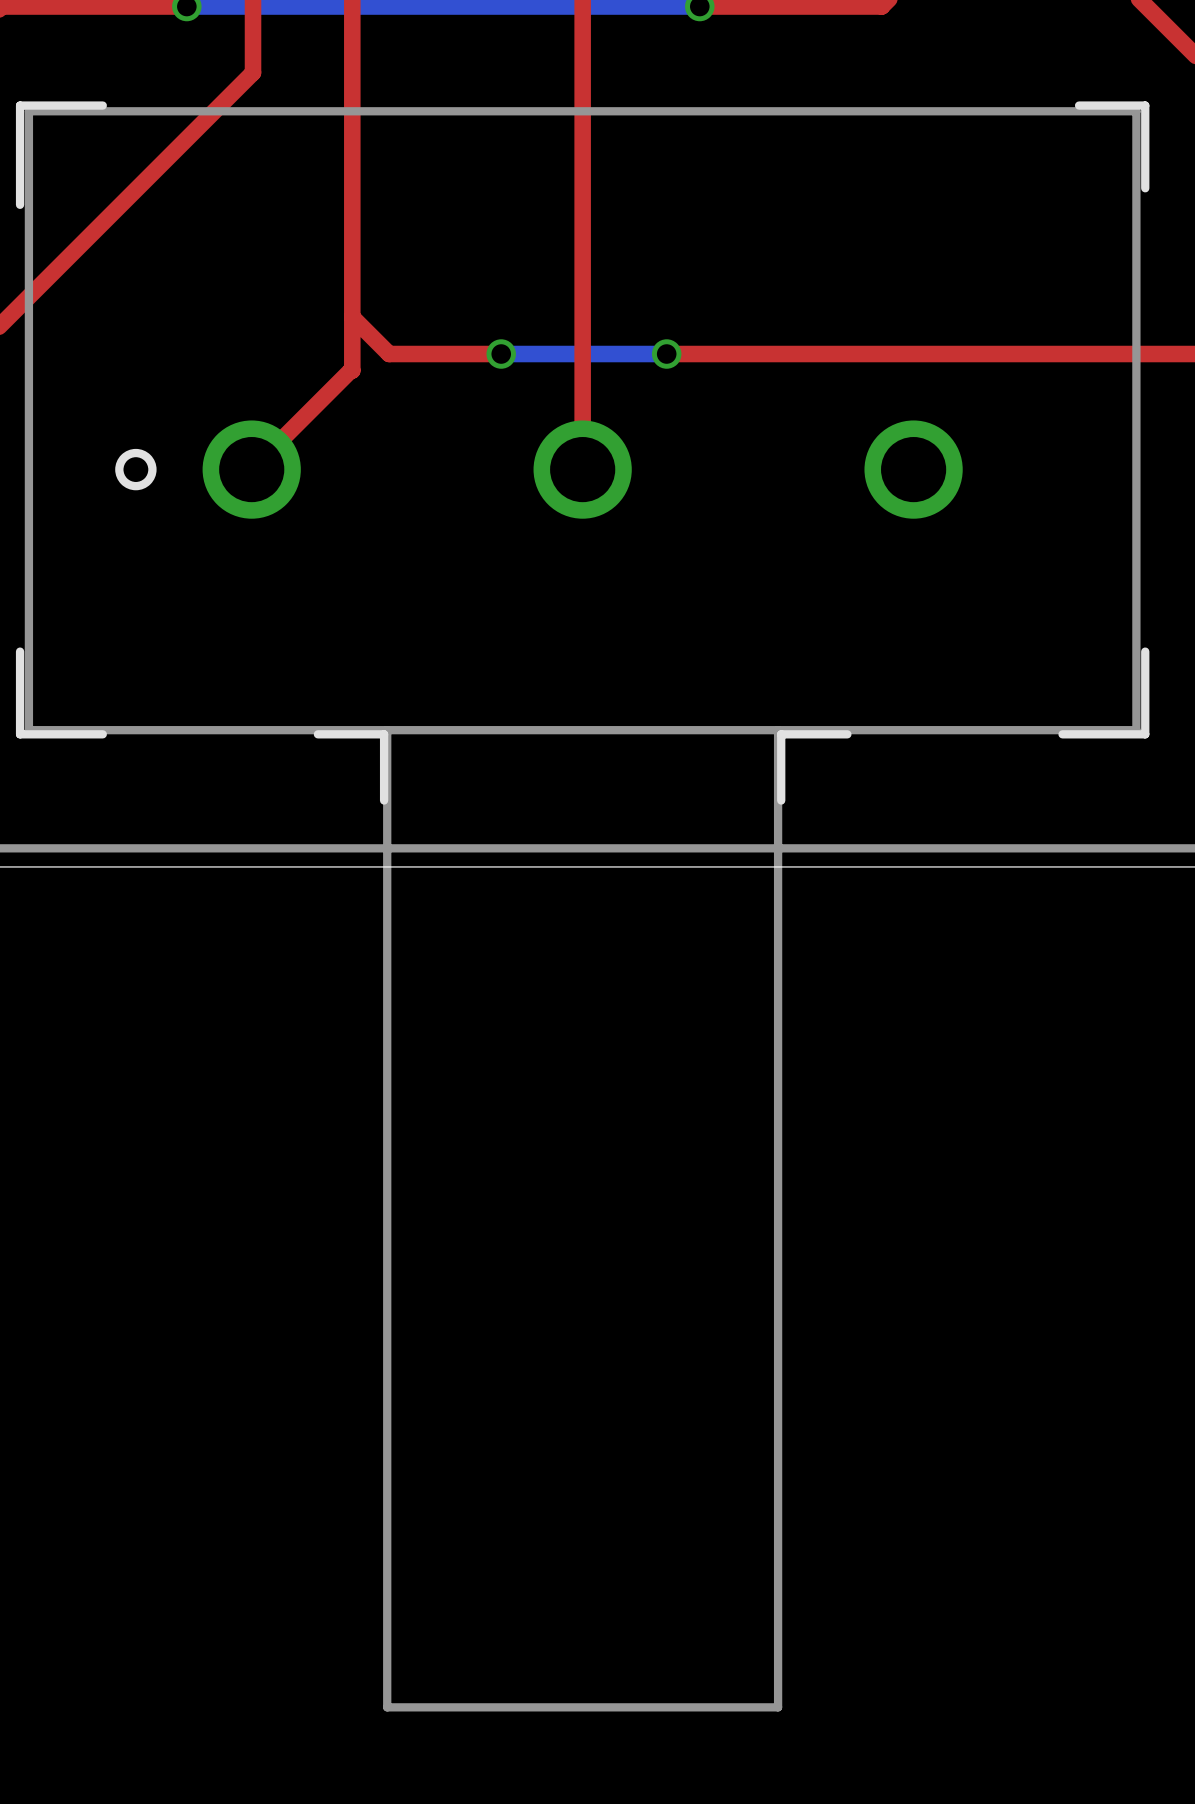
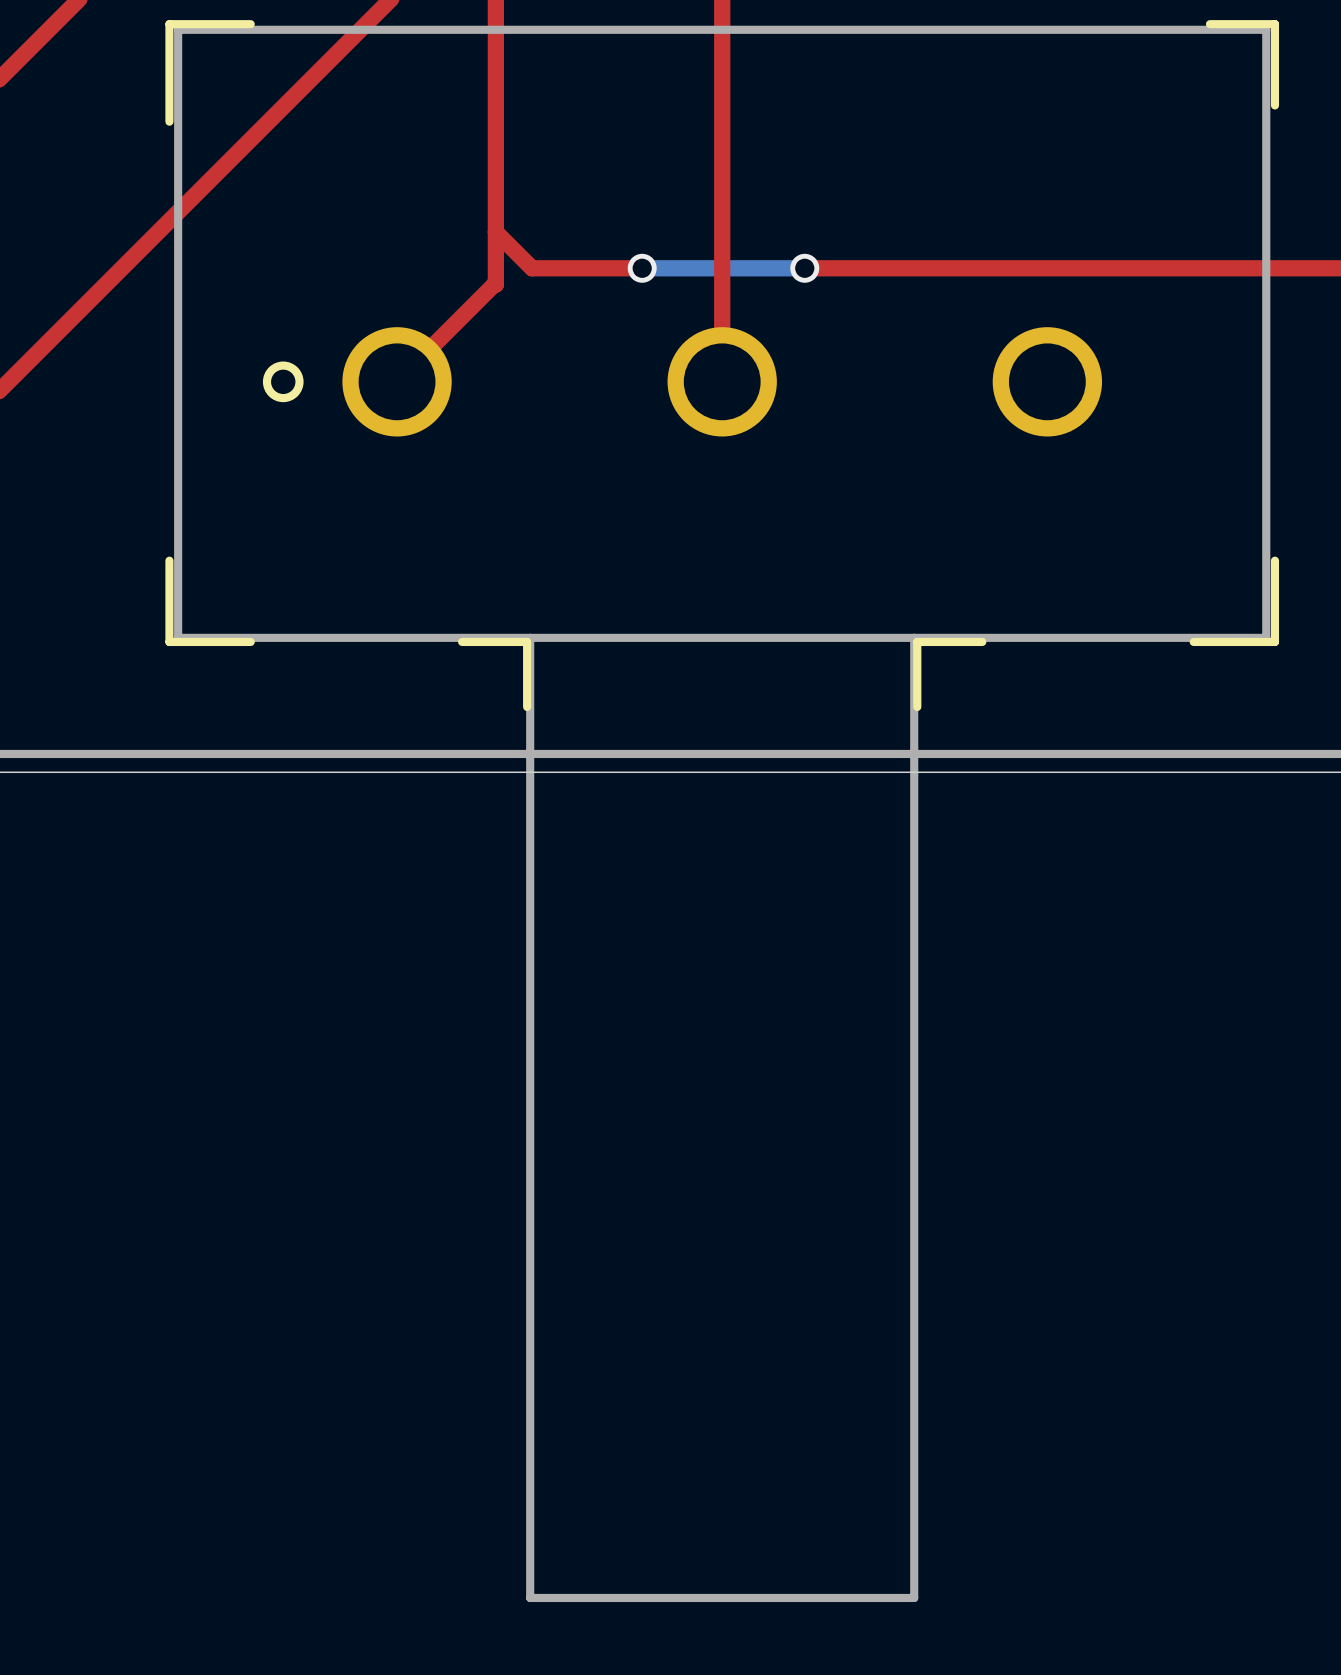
part footprint: [15, 101, 1150, 1712] -> [165, 20, 1280, 1603]

